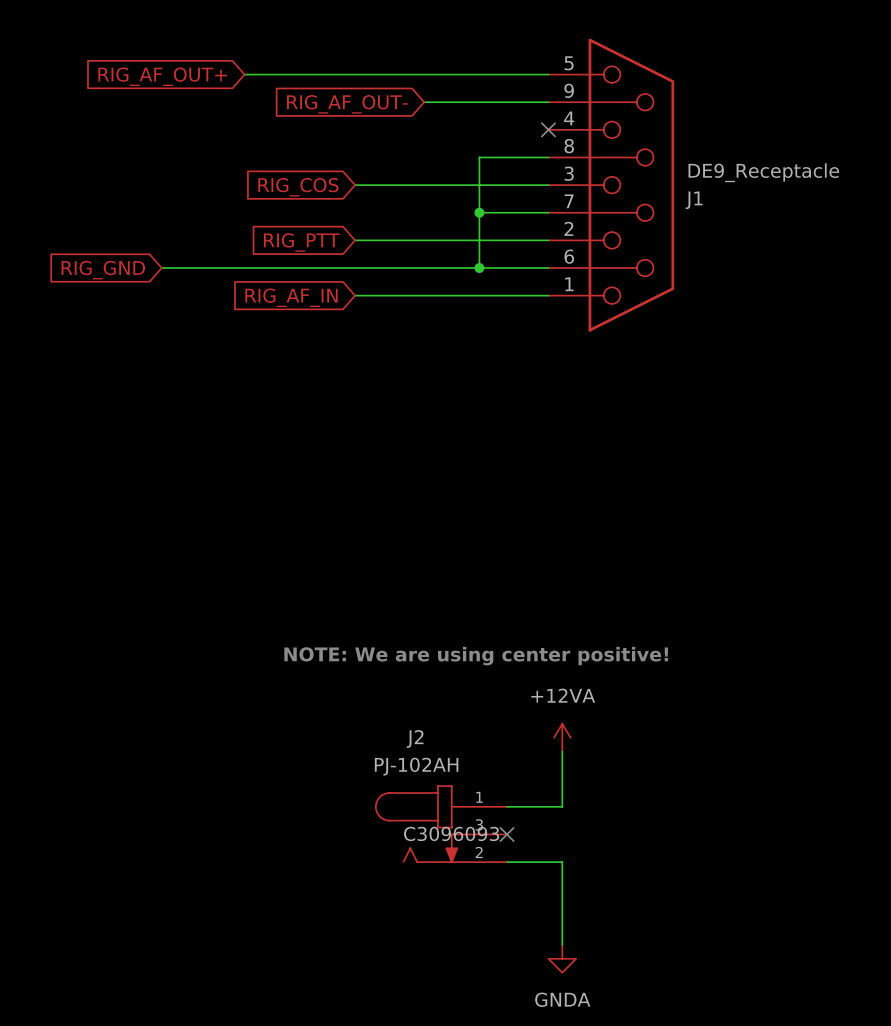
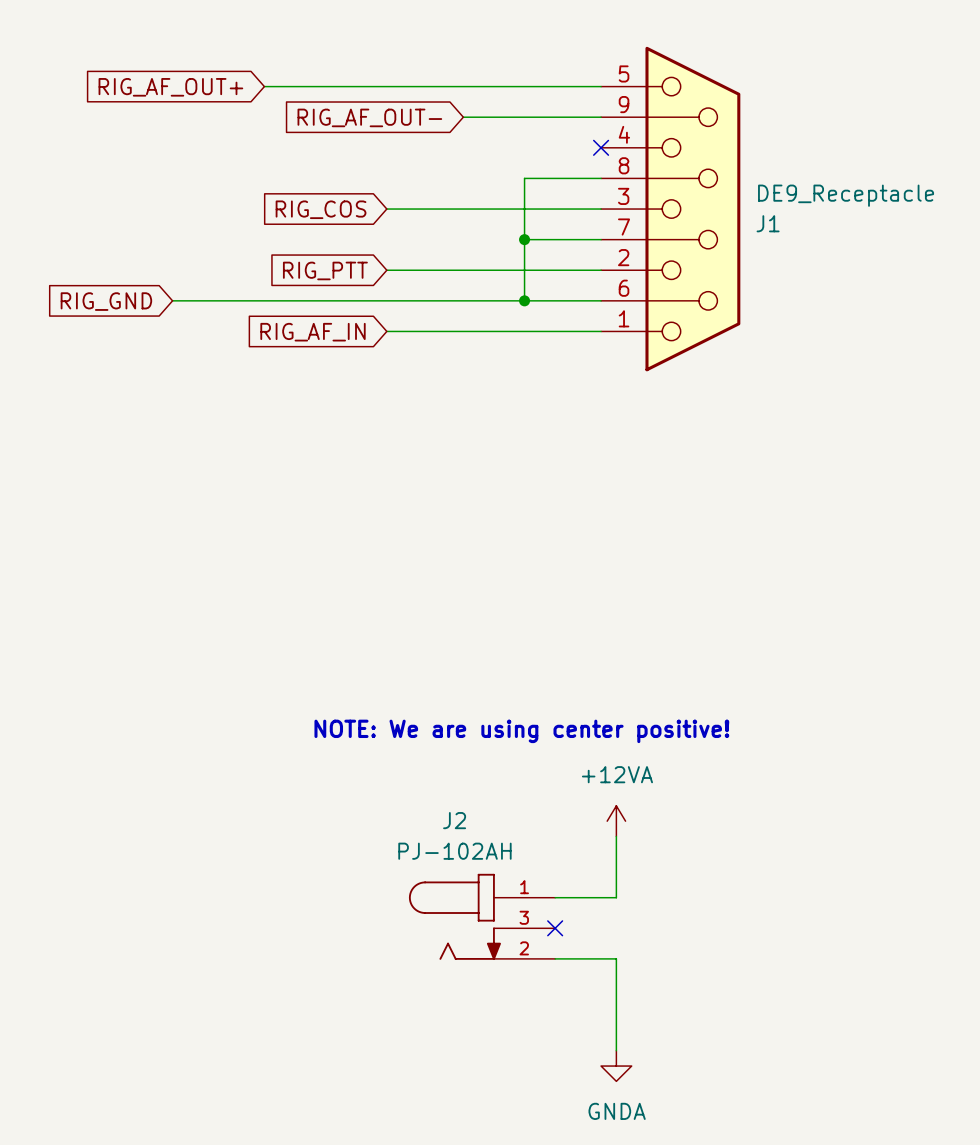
J2 text: C3096093 (451, 833) -> none

